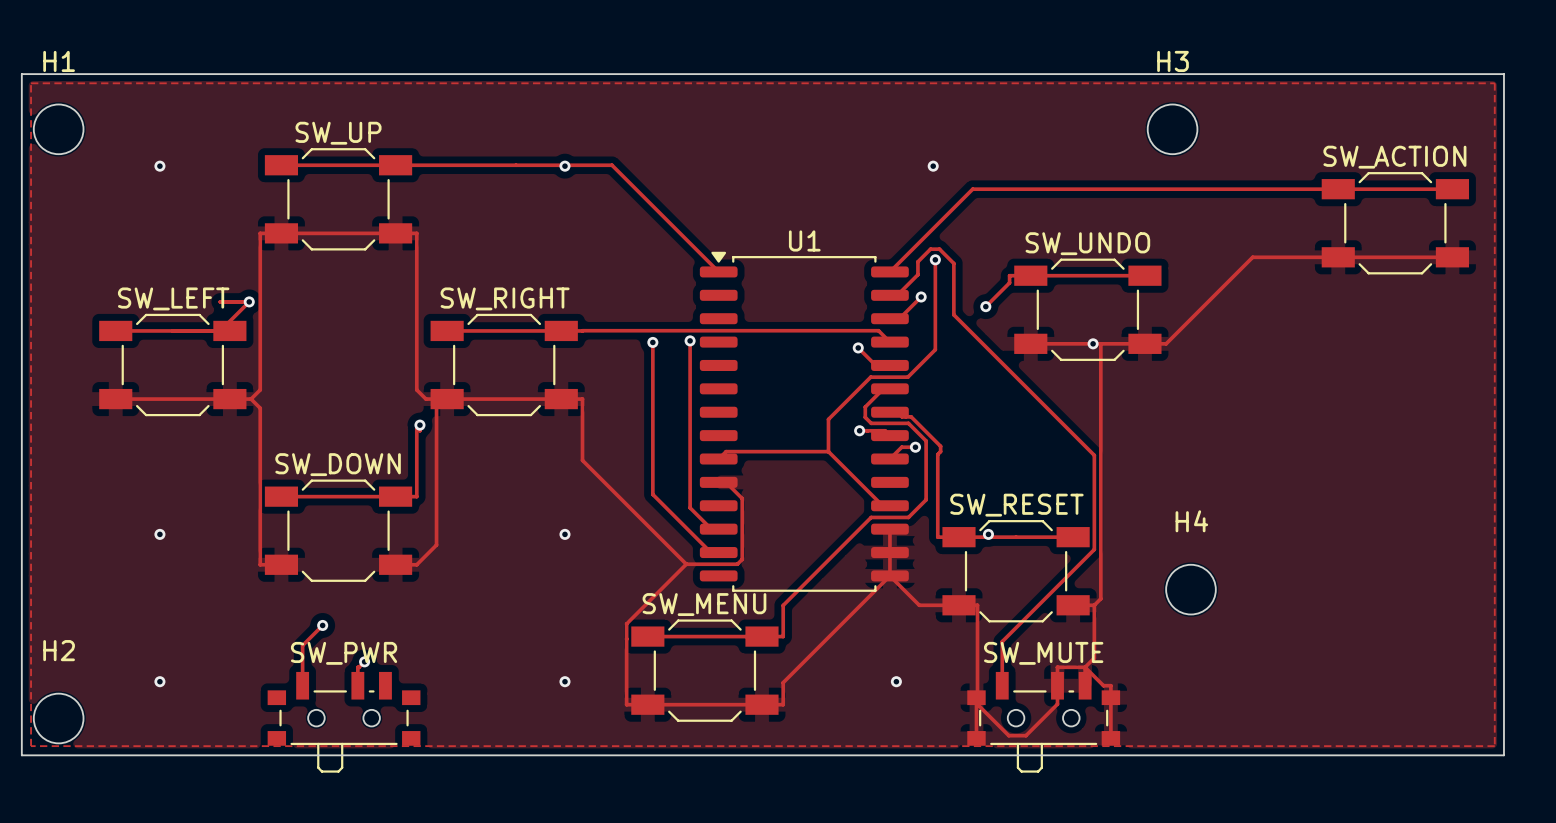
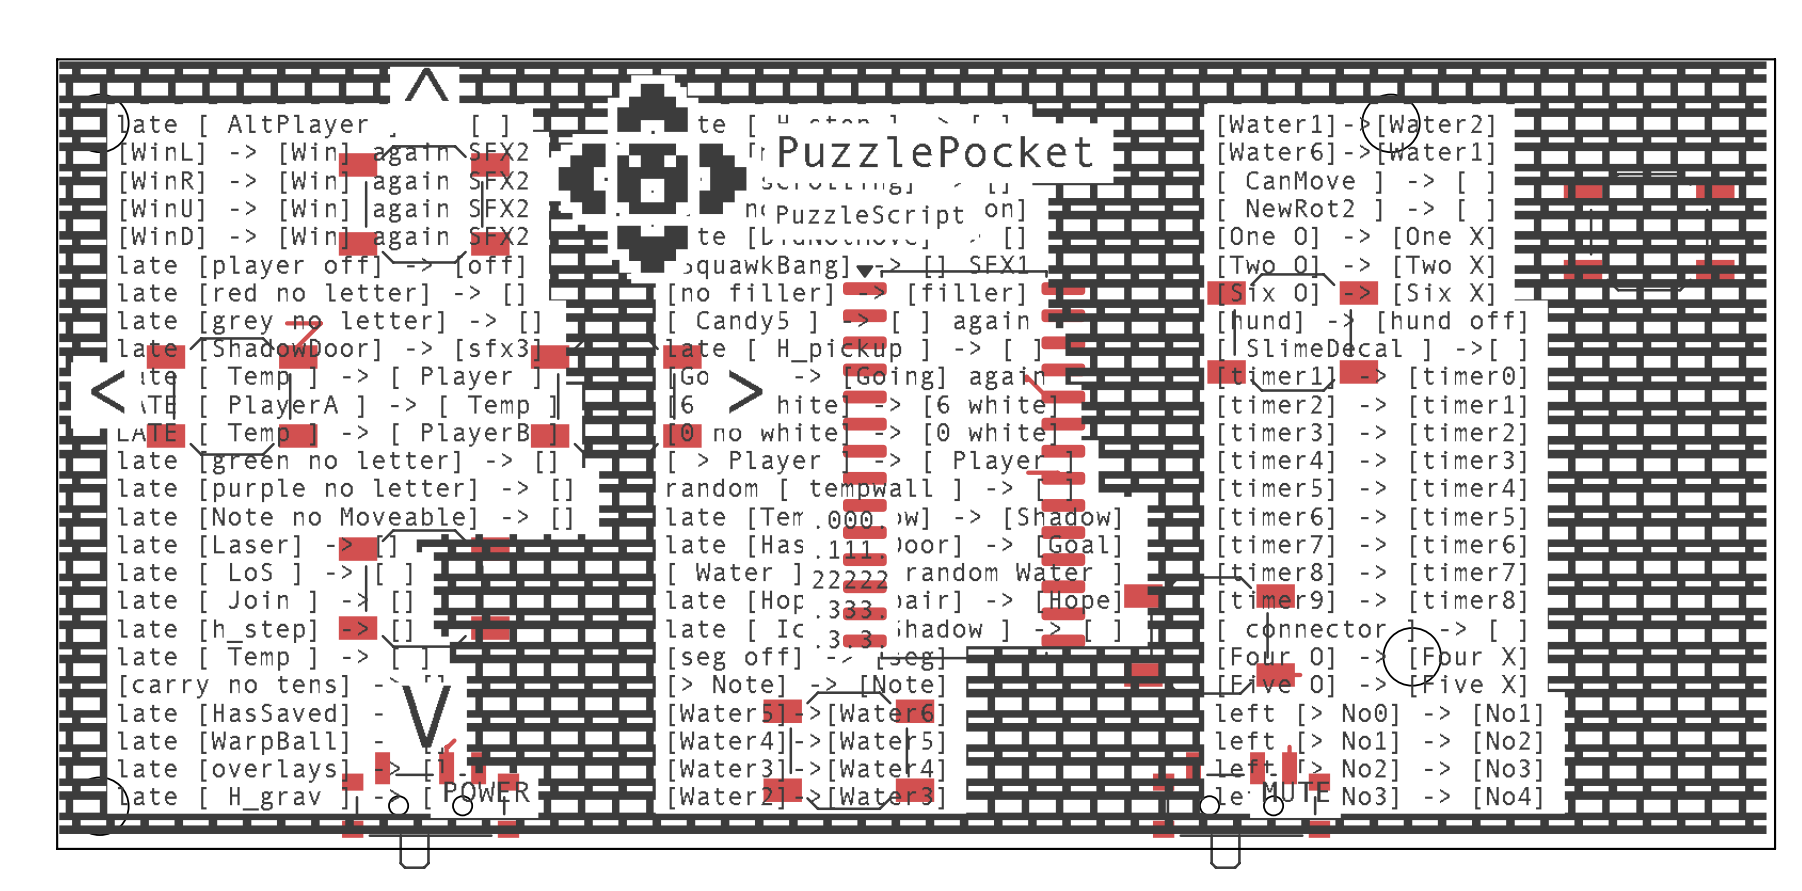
H1 name: H1 (59, 61) -> none
H3 name: H3 (1173, 61) -> none
drawing: none -> [59, 61, 1767, 834]
zone outline: (31, 83) (1494, 83) (1494, 746) (31, 746) (31, 83) -> none
SW_UP name: SW_UP (338, 133) -> none
SW_ACTION name: SW_ACTION (1394, 157) -> none
track: (281, 165) (612, 165) (718, 271) -> none
via: (159, 166) -> none
via: (564, 166) -> none
via: (933, 166) -> none
track: (1452, 189) (972, 189) (889, 271) -> none
U1 name: U1 (804, 240) -> none
SW_UNDO name: SW_UNDO (1087, 243) -> none
track: (1452, 257) (1252, 257) (1166, 343) (1030, 343) -> none
track: (935, 259) (935, 349) (907, 377) (870, 377) (828, 419) (828, 451) -> none
via: (935, 259) -> none
track: (1144, 275) (1009, 275) (1009, 282) (985, 306) -> none
track: (889, 295) (897, 295) (917, 274) (917, 261) (930, 249) (939, 249) (953, 263) (953, 314) (1094, 455) (1094, 549) (1002, 641) (1002, 685) -> none
track: (921, 296) (899, 318) (889, 318) -> none
via: (921, 296) -> none
SW_LEFT name: SW_LEFT (173, 298) -> none
SW_RIGHT name: SW_RIGHT (505, 298) -> none
via: (249, 301) -> none
via: (985, 306) -> none
track: (115, 330) (229, 330) -> none
track: (447, 330) (582, 330) -> none
track: (582, 330) (878, 330) (889, 342) -> none
track: (690, 340) (690, 507) (711, 529) (718, 529) -> none
via: (690, 340) -> none
track: (652, 342) (652, 494) (710, 552) (718, 552) -> none
via: (652, 342) -> none
via: (1093, 343) -> none
track: (1100, 343) (1100, 598) (1094, 605) (1094, 658) (1085, 667) -> none
via: (858, 347) -> none
track: (889, 388) (883, 388) (865, 407) (865, 417) (871, 423) (908, 423) (926, 440) (926, 499) (908, 517) (871, 517) (783, 605) (783, 636) (647, 636) -> none
track: (115, 399) (251, 399) -> none
track: (251, 399) (260, 389) (260, 233) (416, 233) (416, 389) (425, 399) (582, 399) (582, 460) (686, 564) -> none
track: (251, 399) (260, 408) (260, 564) (281, 564) -> none
track: (436, 399) (436, 545) (416, 564) (395, 564) -> none
track: (889, 412) (897, 412) (902, 416) (911, 416) (940, 446) (940, 451) (937, 454) (937, 537) (1073, 537) -> none
via: (419, 425) -> none
track: (419, 430) (419, 425) (416, 428) (416, 496) (281, 496) -> none
via: (859, 430) -> none
track: (915, 447) (901, 447) (889, 459) -> none
via: (915, 447) -> none
track: (828, 451) (726, 451) (718, 459) -> none
track: (828, 451) (882, 505) (889, 505) -> none
SW_DOWN name: SW_DOWN (338, 464) -> none
track: (718, 482) (726, 482) (742, 498) (742, 559) (737, 564) (686, 564) -> none
SW_RESET name: SW_RESET (1016, 505) -> none
H4 name: H4 (1191, 521) -> none
track: (889, 529) (889, 575) -> none
via: (159, 534) -> none
via: (564, 534) -> none
via: (988, 534) -> none
track: (686, 564) (626, 623) (626, 704) (783, 704) (783, 682) (889, 575) -> none
track: (889, 575) (919, 605) (977, 605) (977, 704) (1008, 735) (1026, 735) (1057, 704) (1057, 667) (1085, 667) -> none
SW_MENU name: SW_MENU (704, 604) -> none
track: (322, 625) (302, 645) (302, 685) -> none
via: (322, 625) -> none
drawing: none -> [375, 713, 383, 716]
H2 name: H2 (59, 650) -> none
SW_PWR name: SW_PWR (344, 653) -> none
SW_MUTE name: SW_MUTE (1043, 653) -> none
via: (364, 661) -> none
track: (1085, 667) (1103, 685) (1110, 685) (1110, 738) -> none
via: (159, 681) -> none
via: (564, 681) -> none
via: (896, 681) -> none
track: (977, 697) (976, 738) -> none

